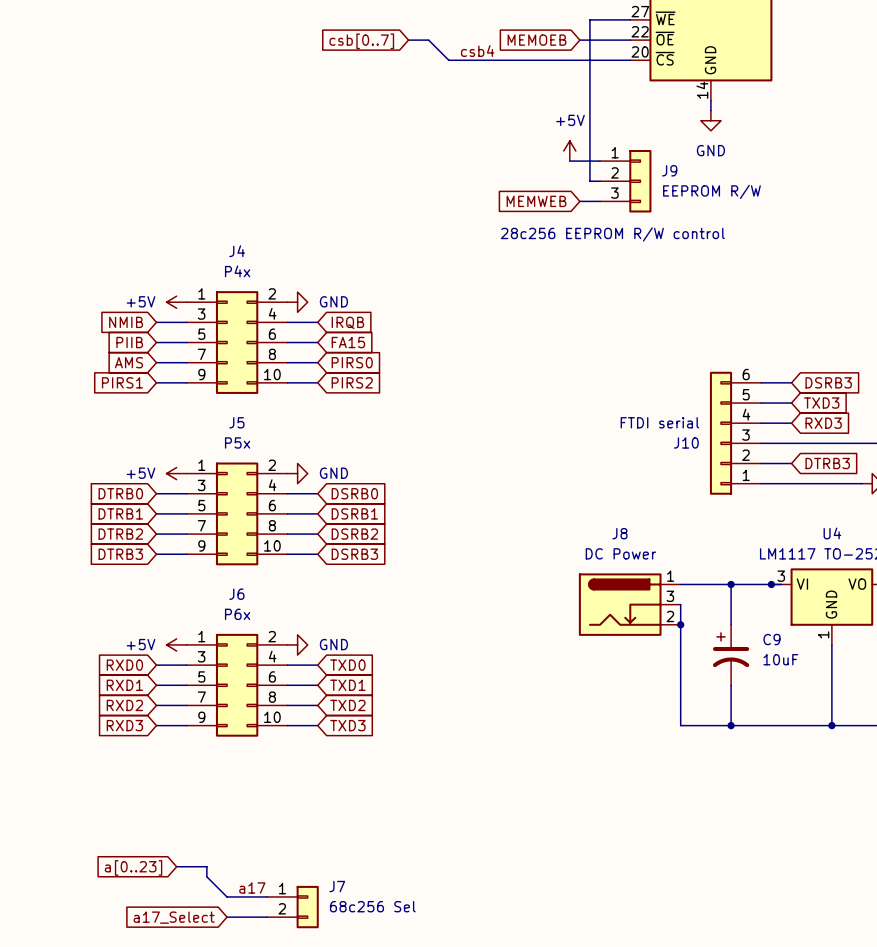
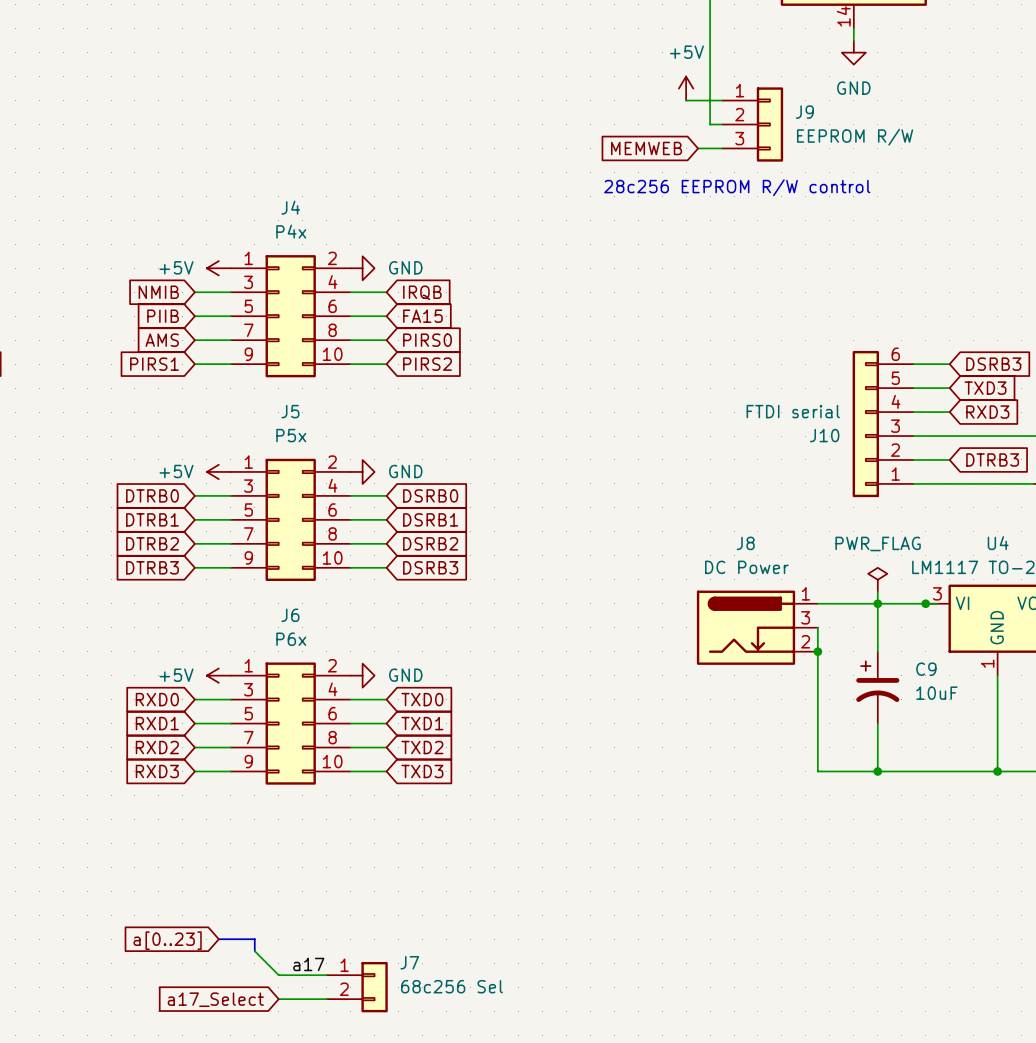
power symbol: none -> PWR_FLAG (877, 579)
wire: none -> (877, 591) (877, 603)

